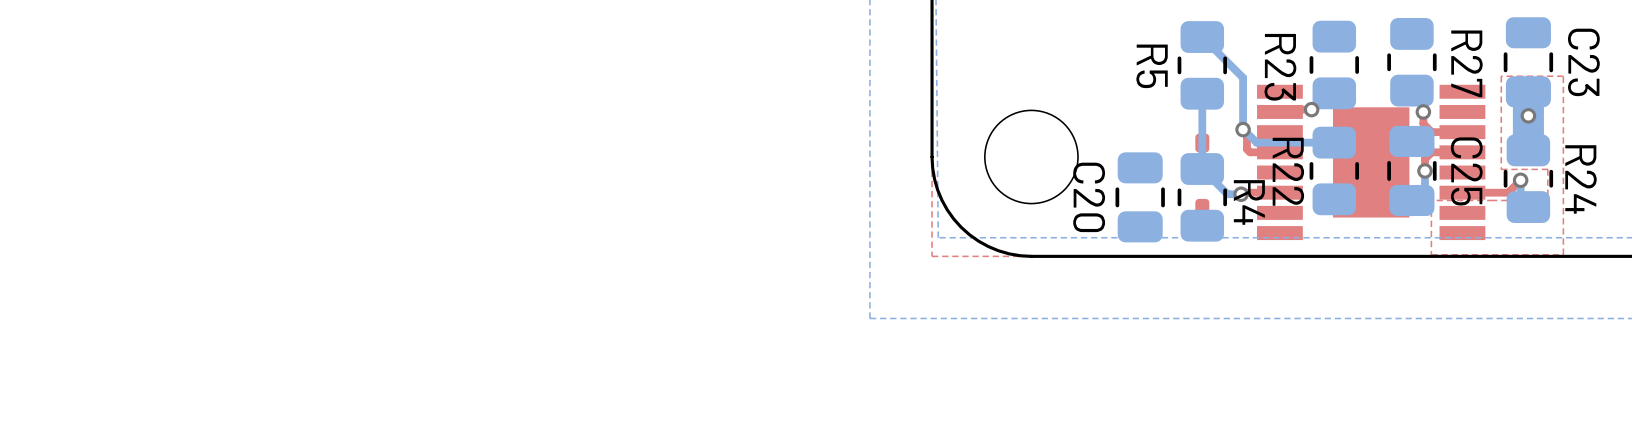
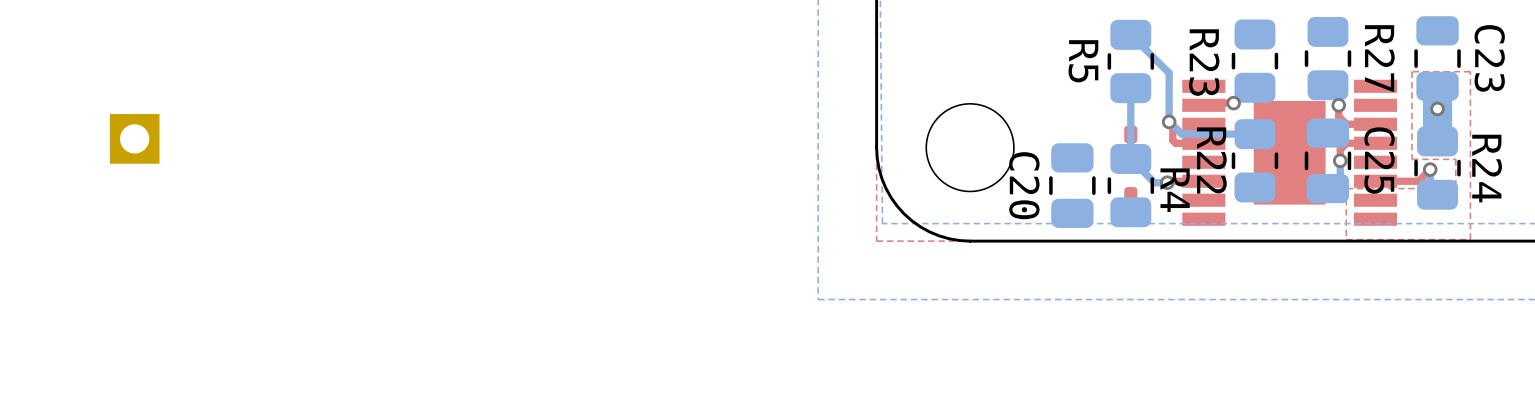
part: none -> (134, 138)

